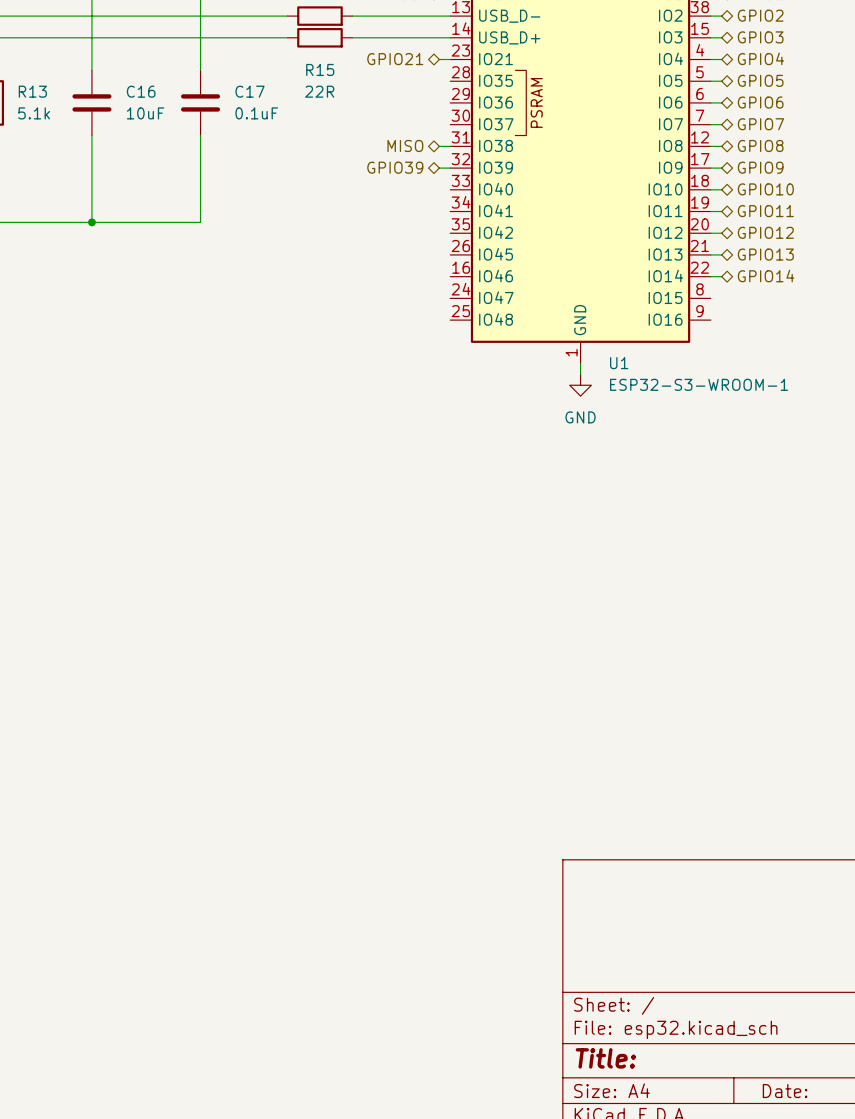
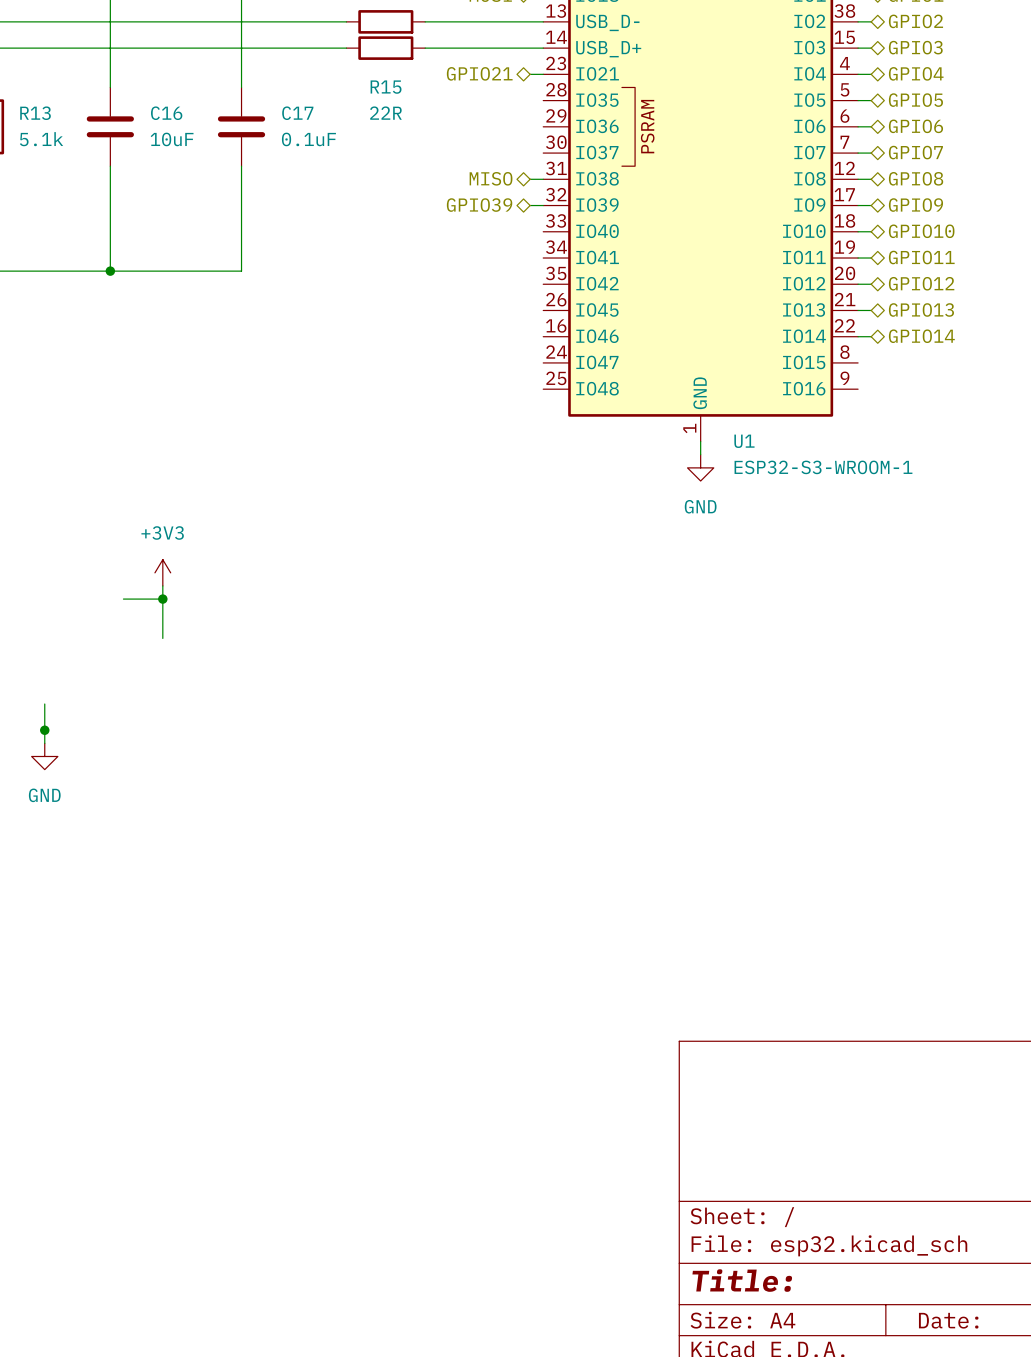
power symbol: none -> +3V3 (162, 572)
wire: none -> (162, 585) (162, 638)
wire: none -> (123, 599) (162, 599)
junction: none -> (162, 599)
wire: none -> (44, 704) (44, 743)
junction: none -> (44, 730)
power symbol: none -> GND (44, 756)

